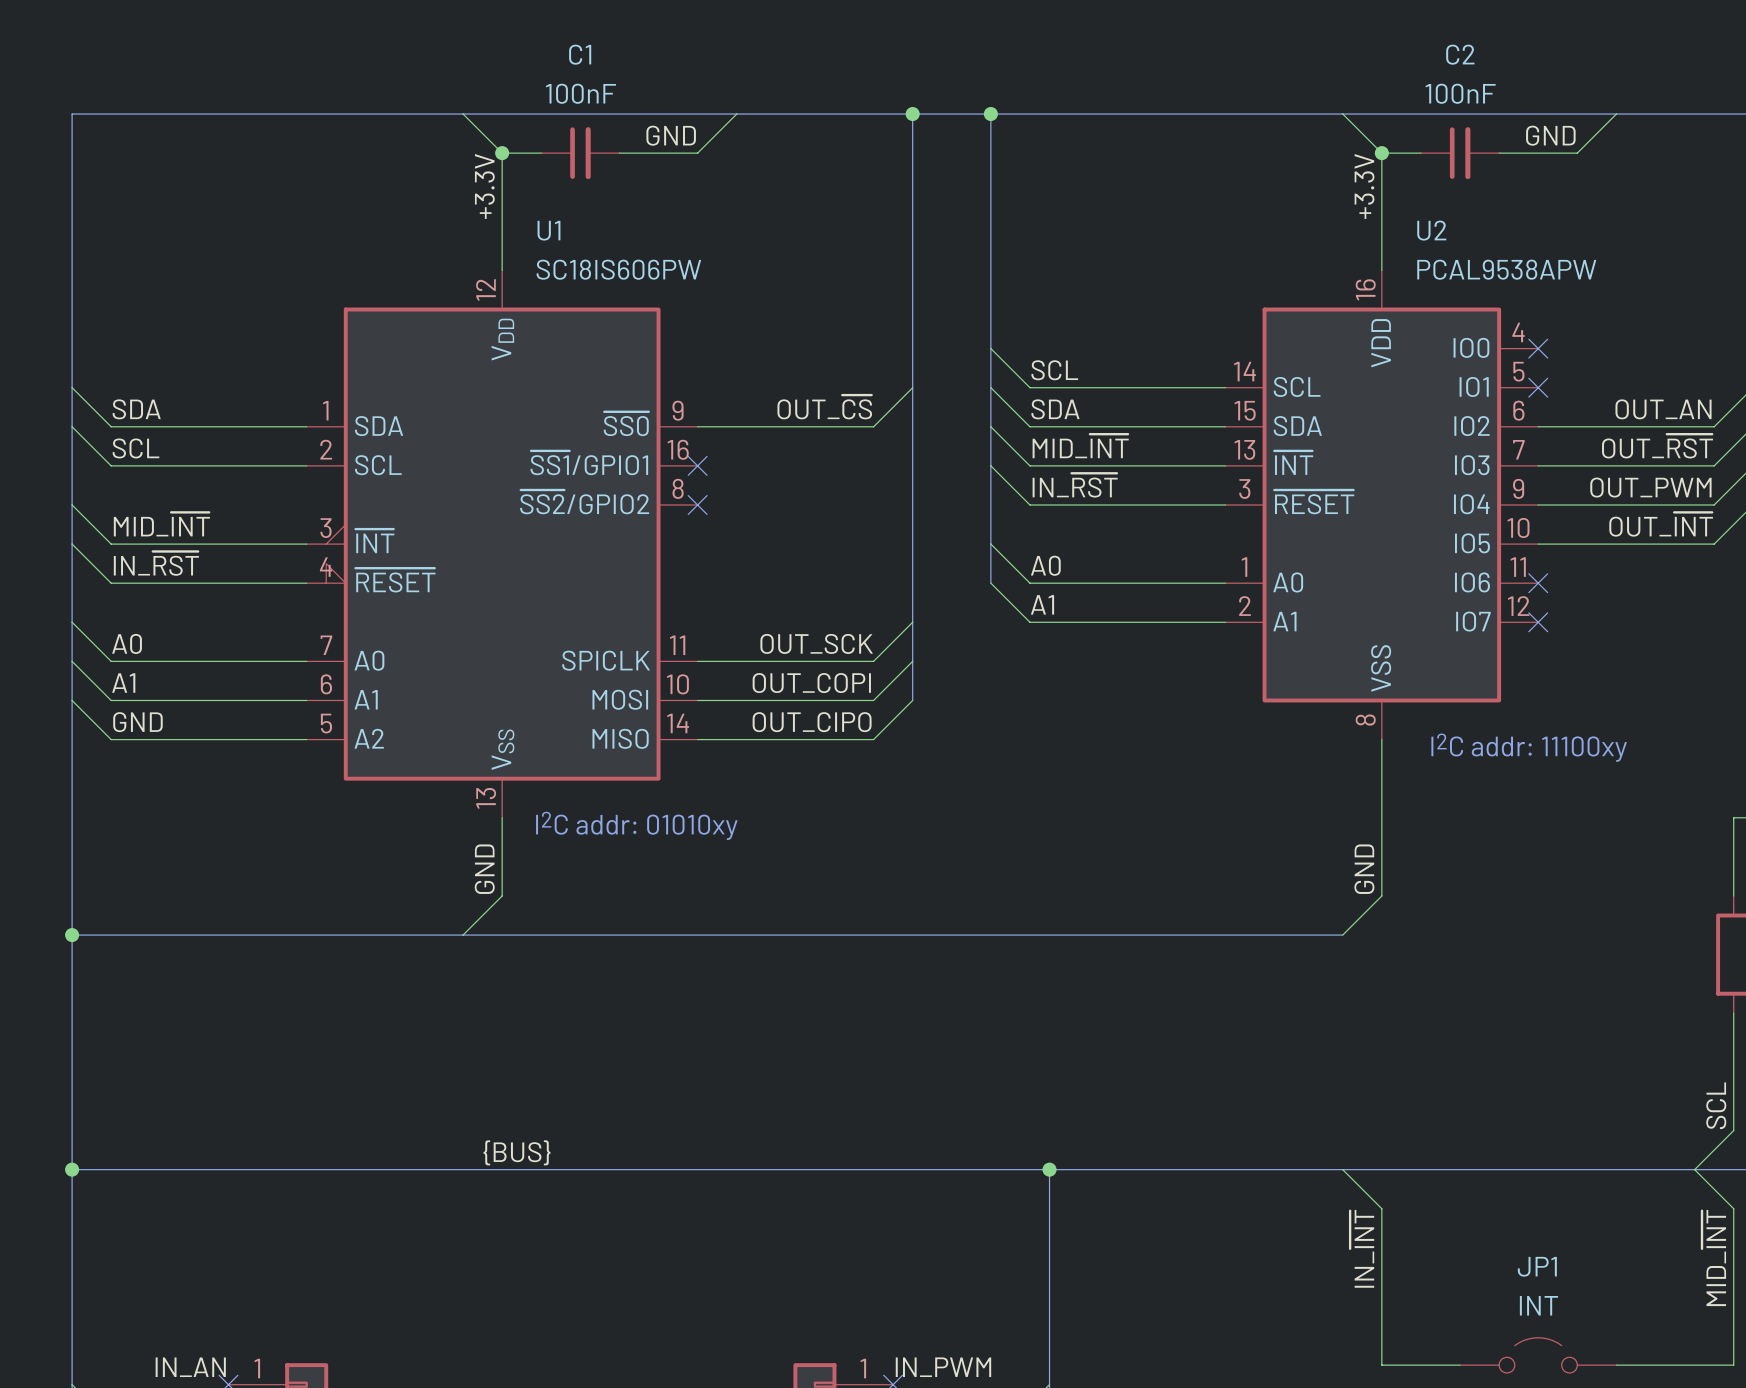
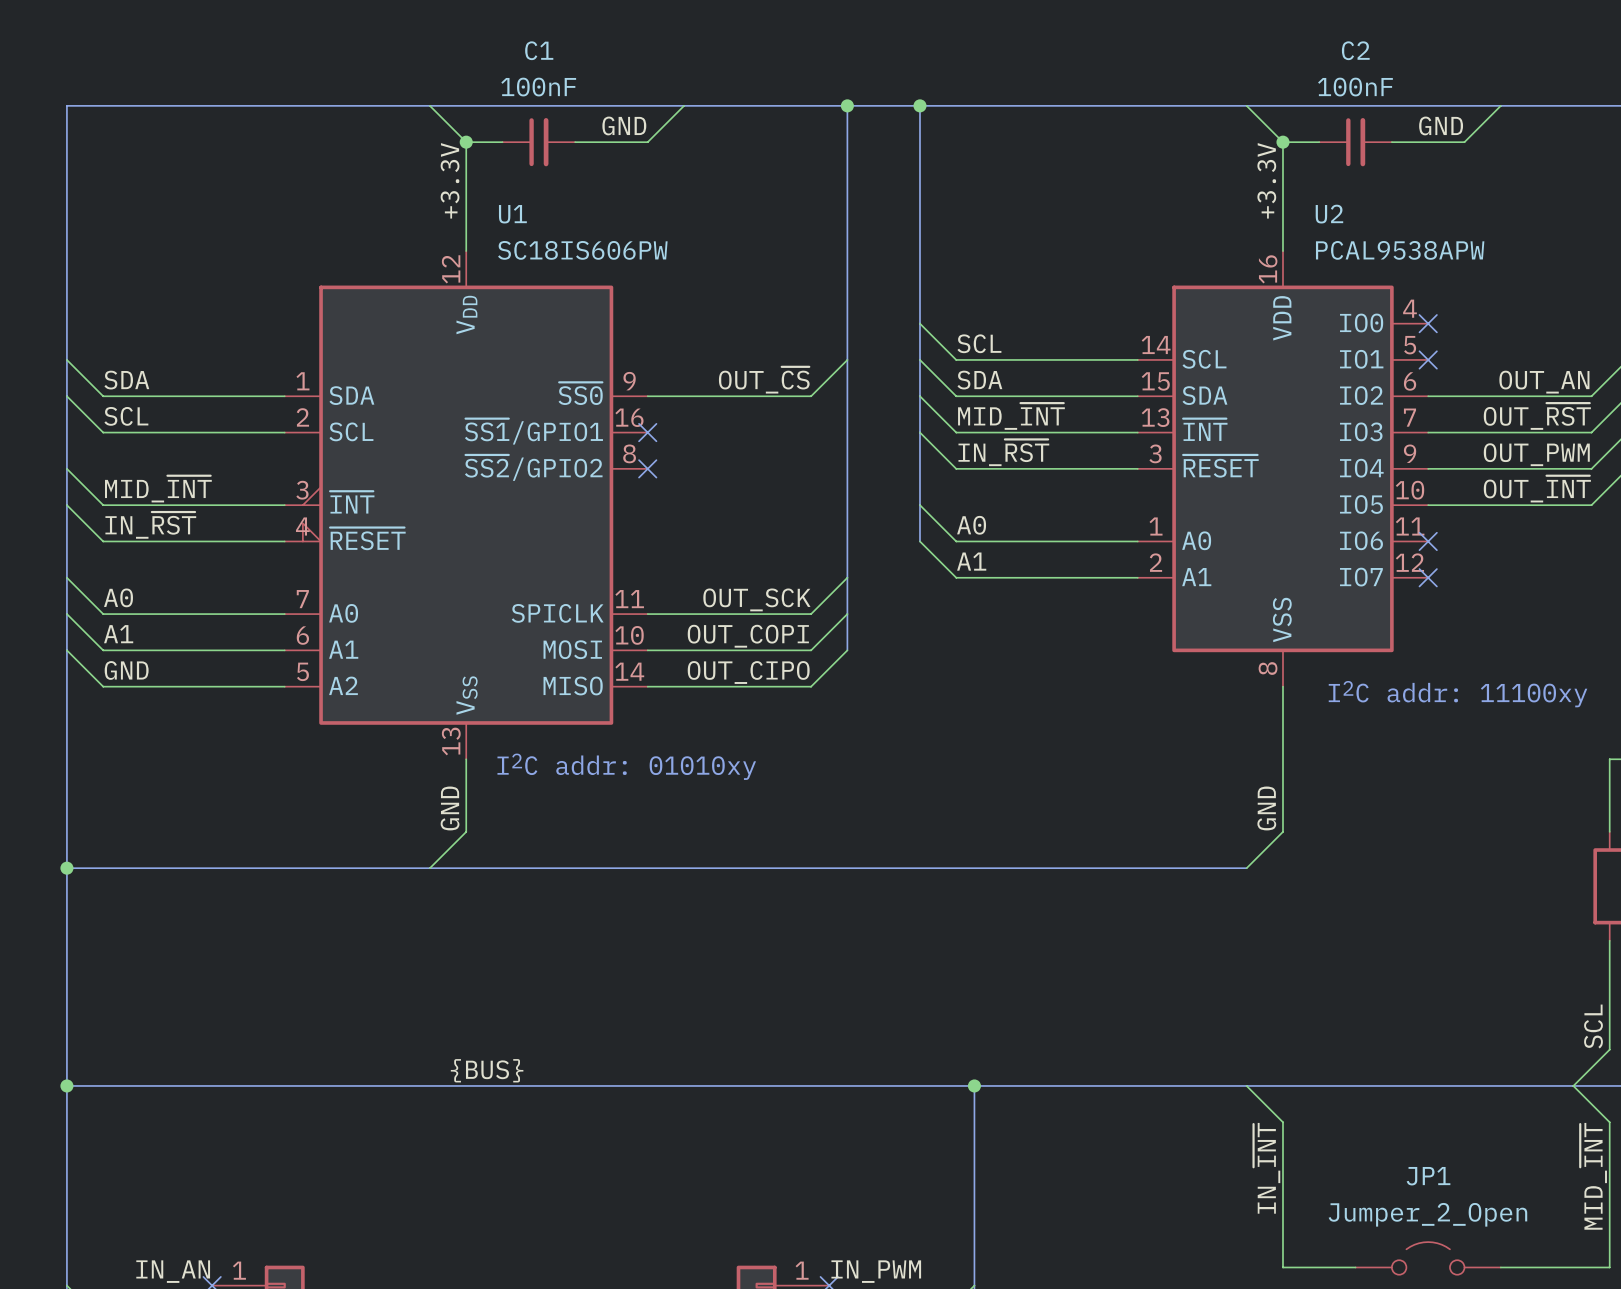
JP1 value: INT (1538, 1305) -> Jumper_2_Open (1427, 1214)

